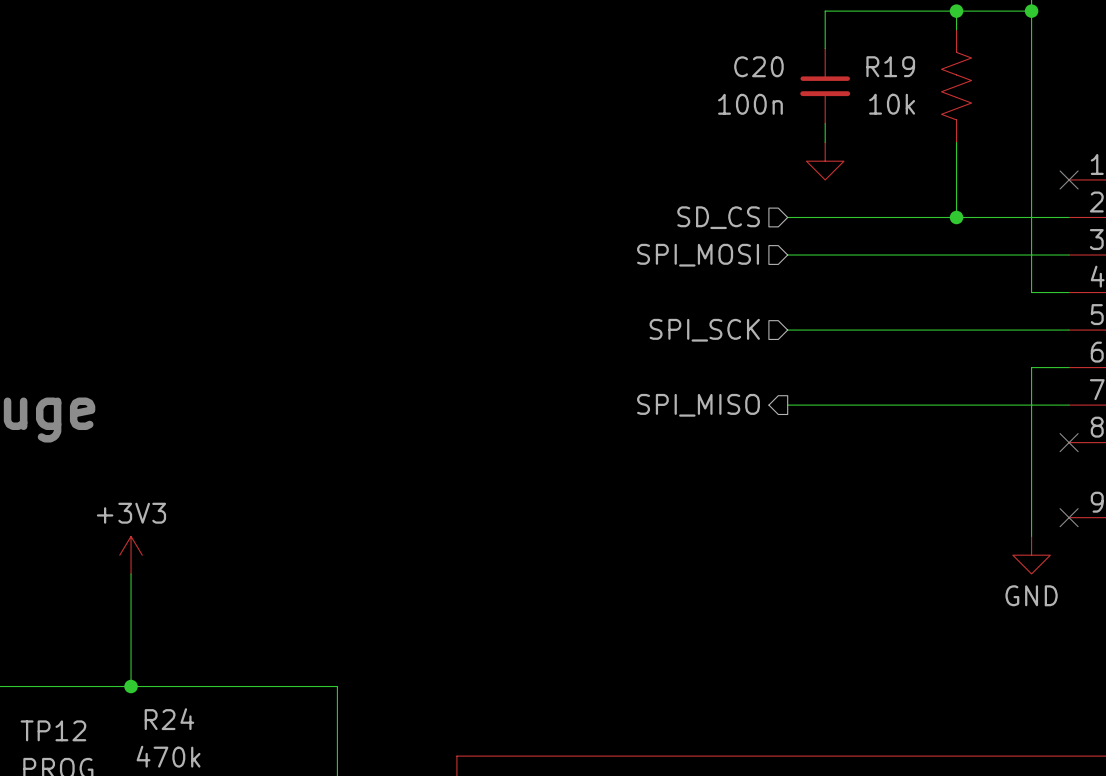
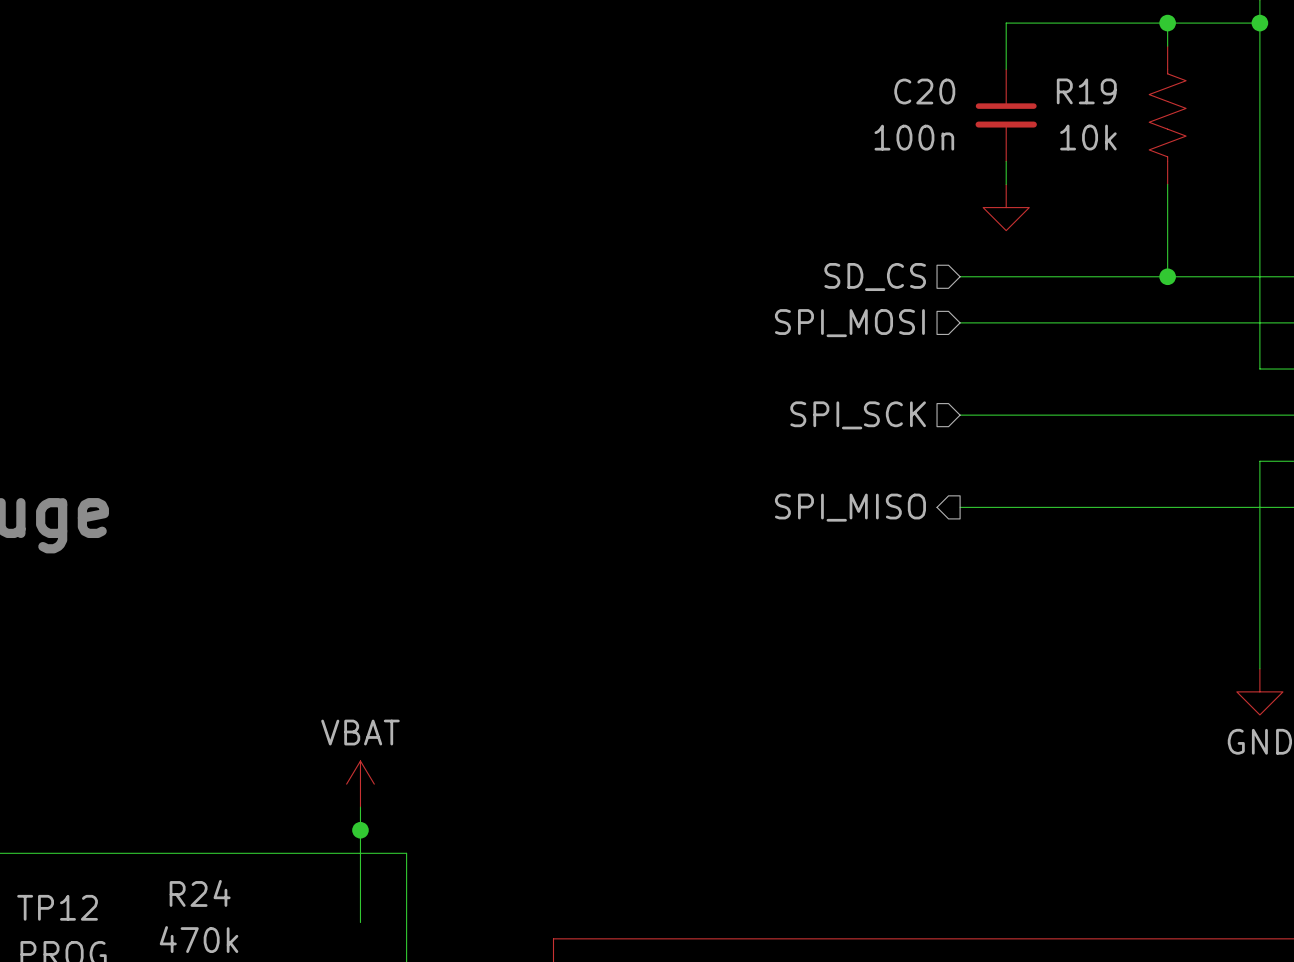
power symbol: +3V3 (131, 555) -> none
wire: (131, 573) (131, 686) -> none
power symbol: none -> VBAT (360, 784)
wire: none -> (360, 807) (360, 922)
junction: none -> (360, 830)
junction: (131, 686) -> none

